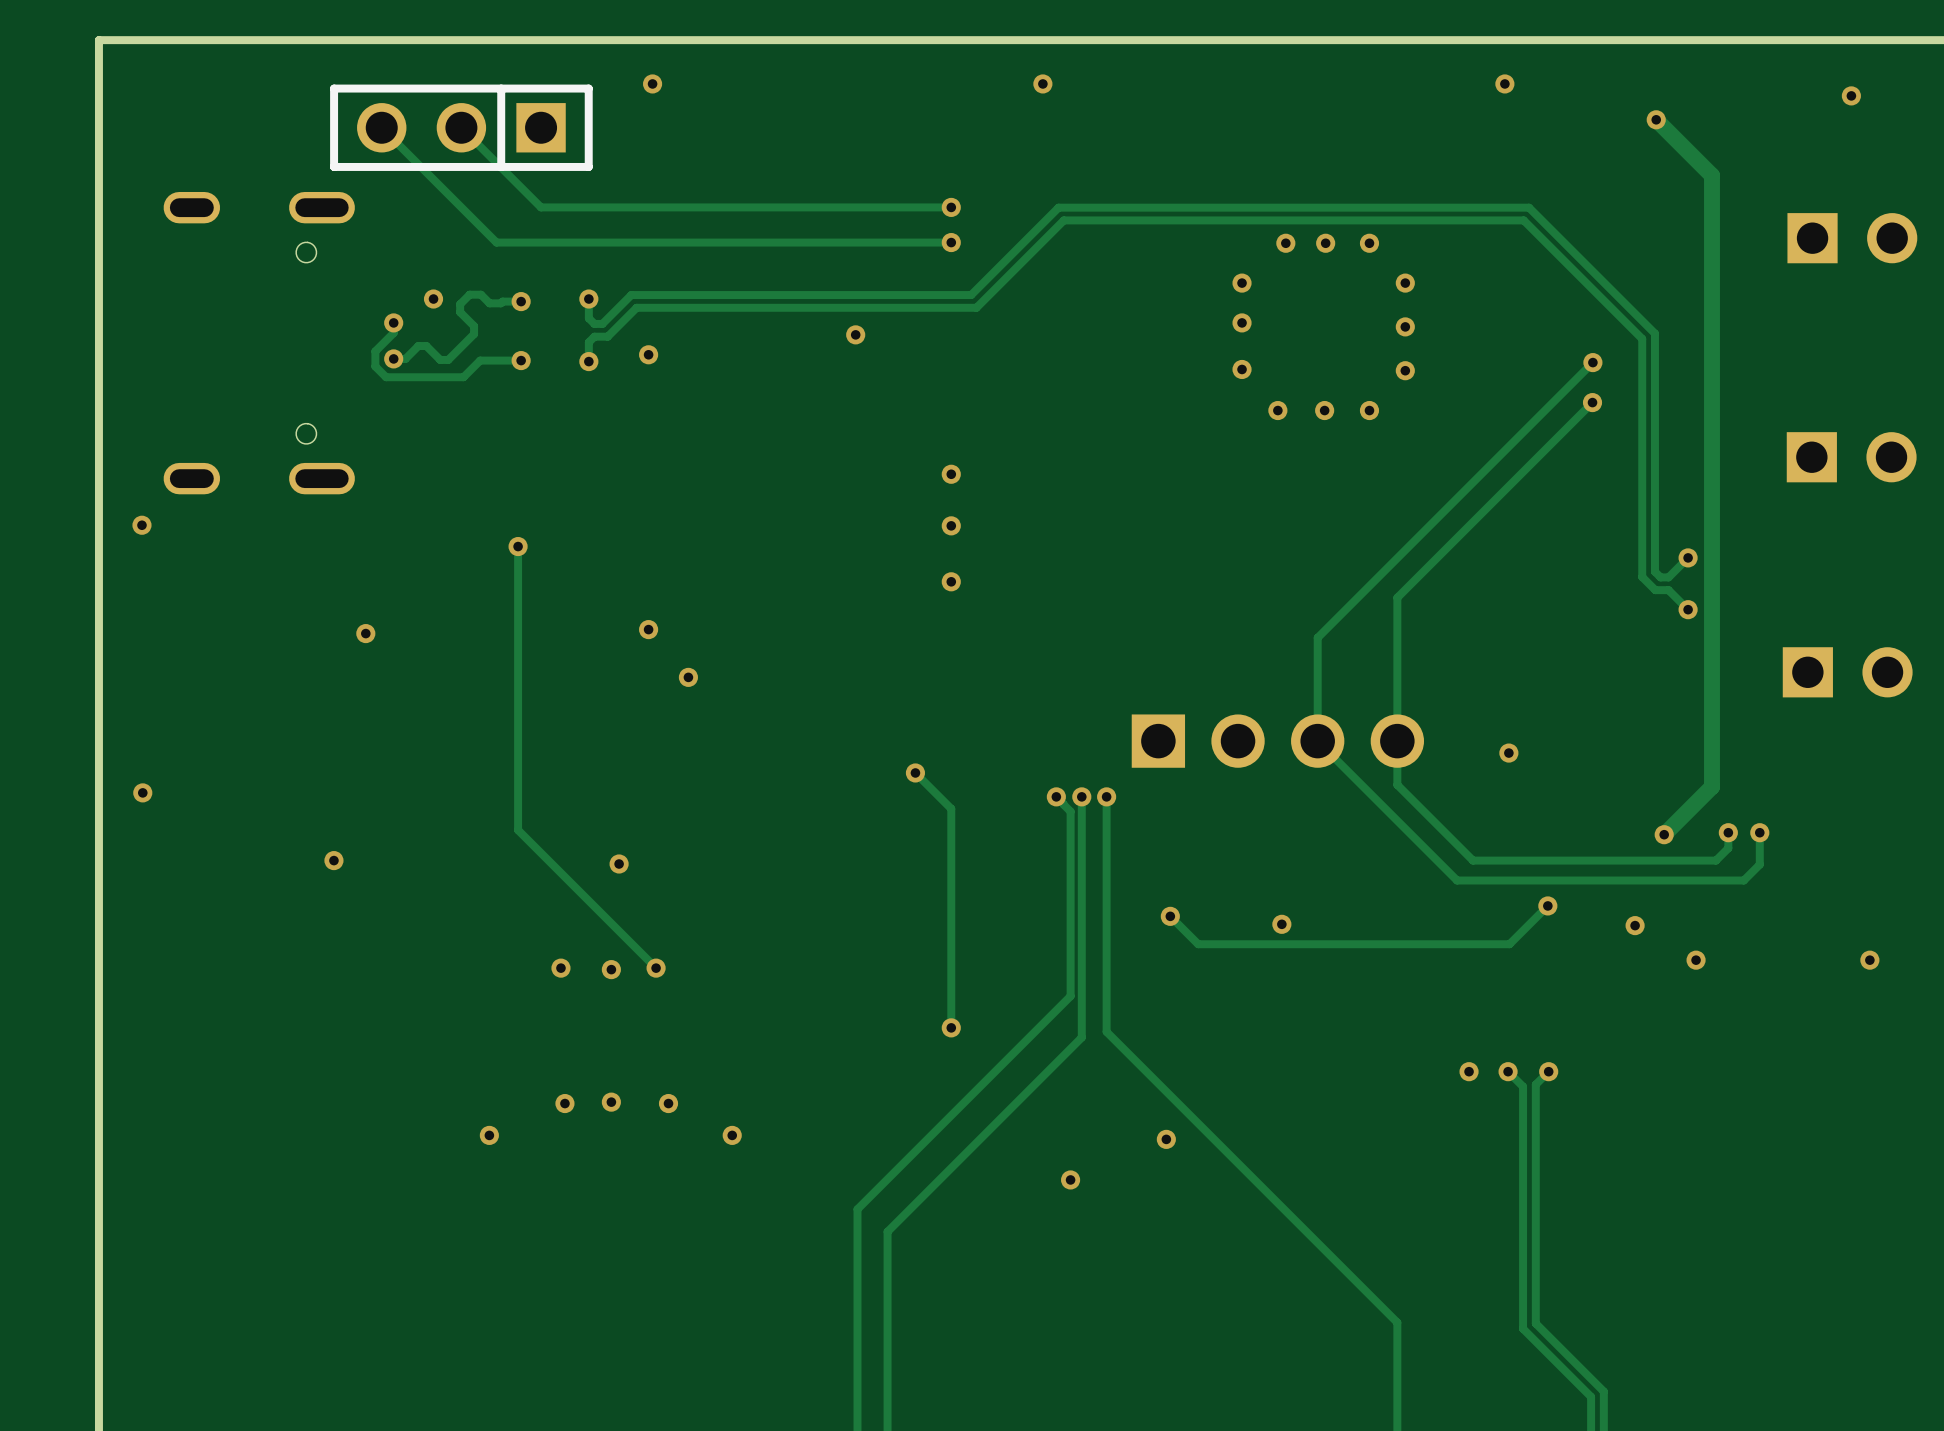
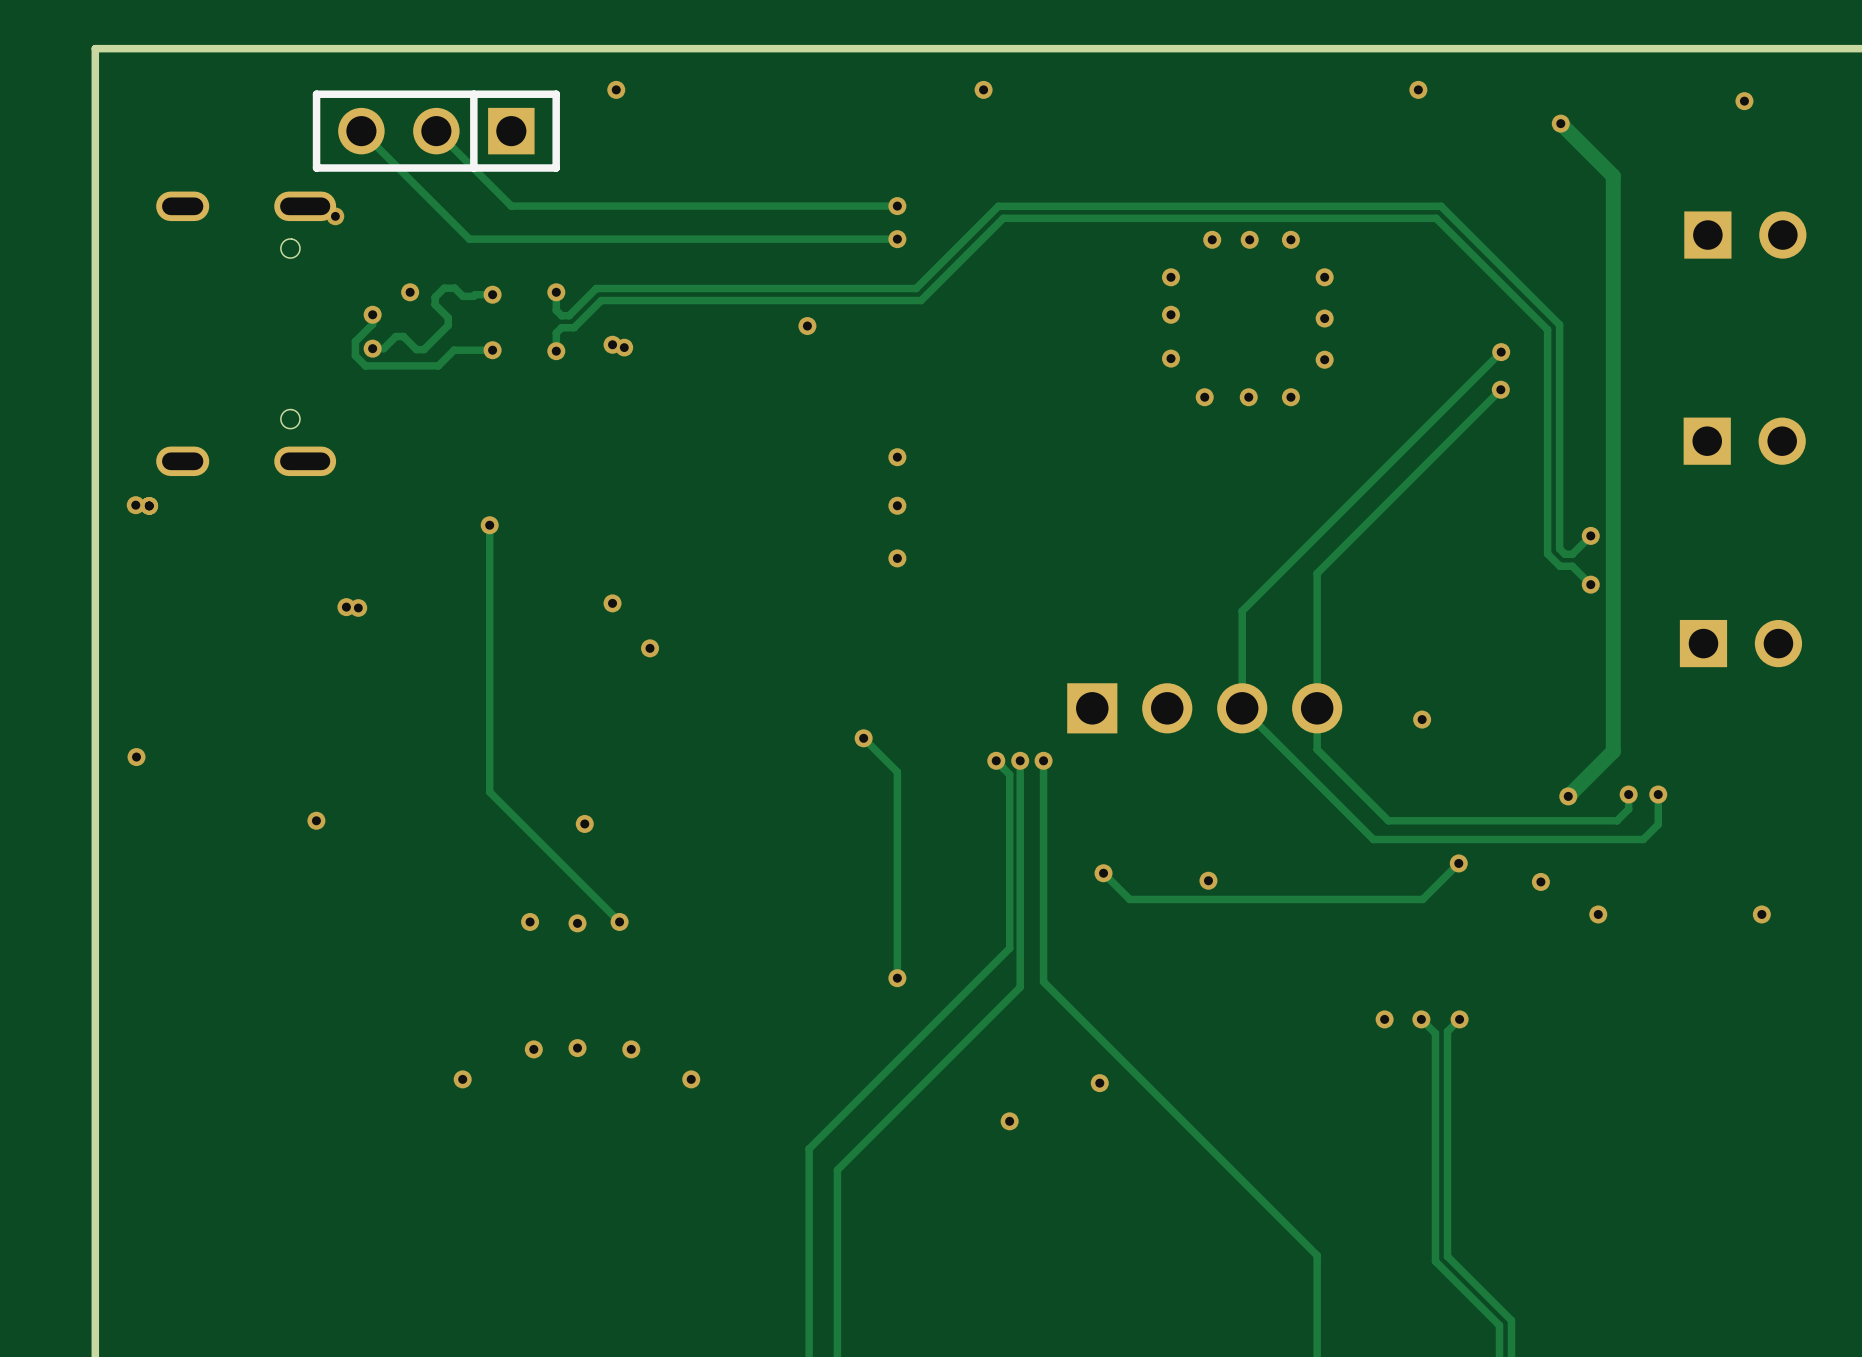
via: none -> (335, 216)
via: none -> (624, 347)
via: none -> (149, 505)
via: none -> (358, 607)

